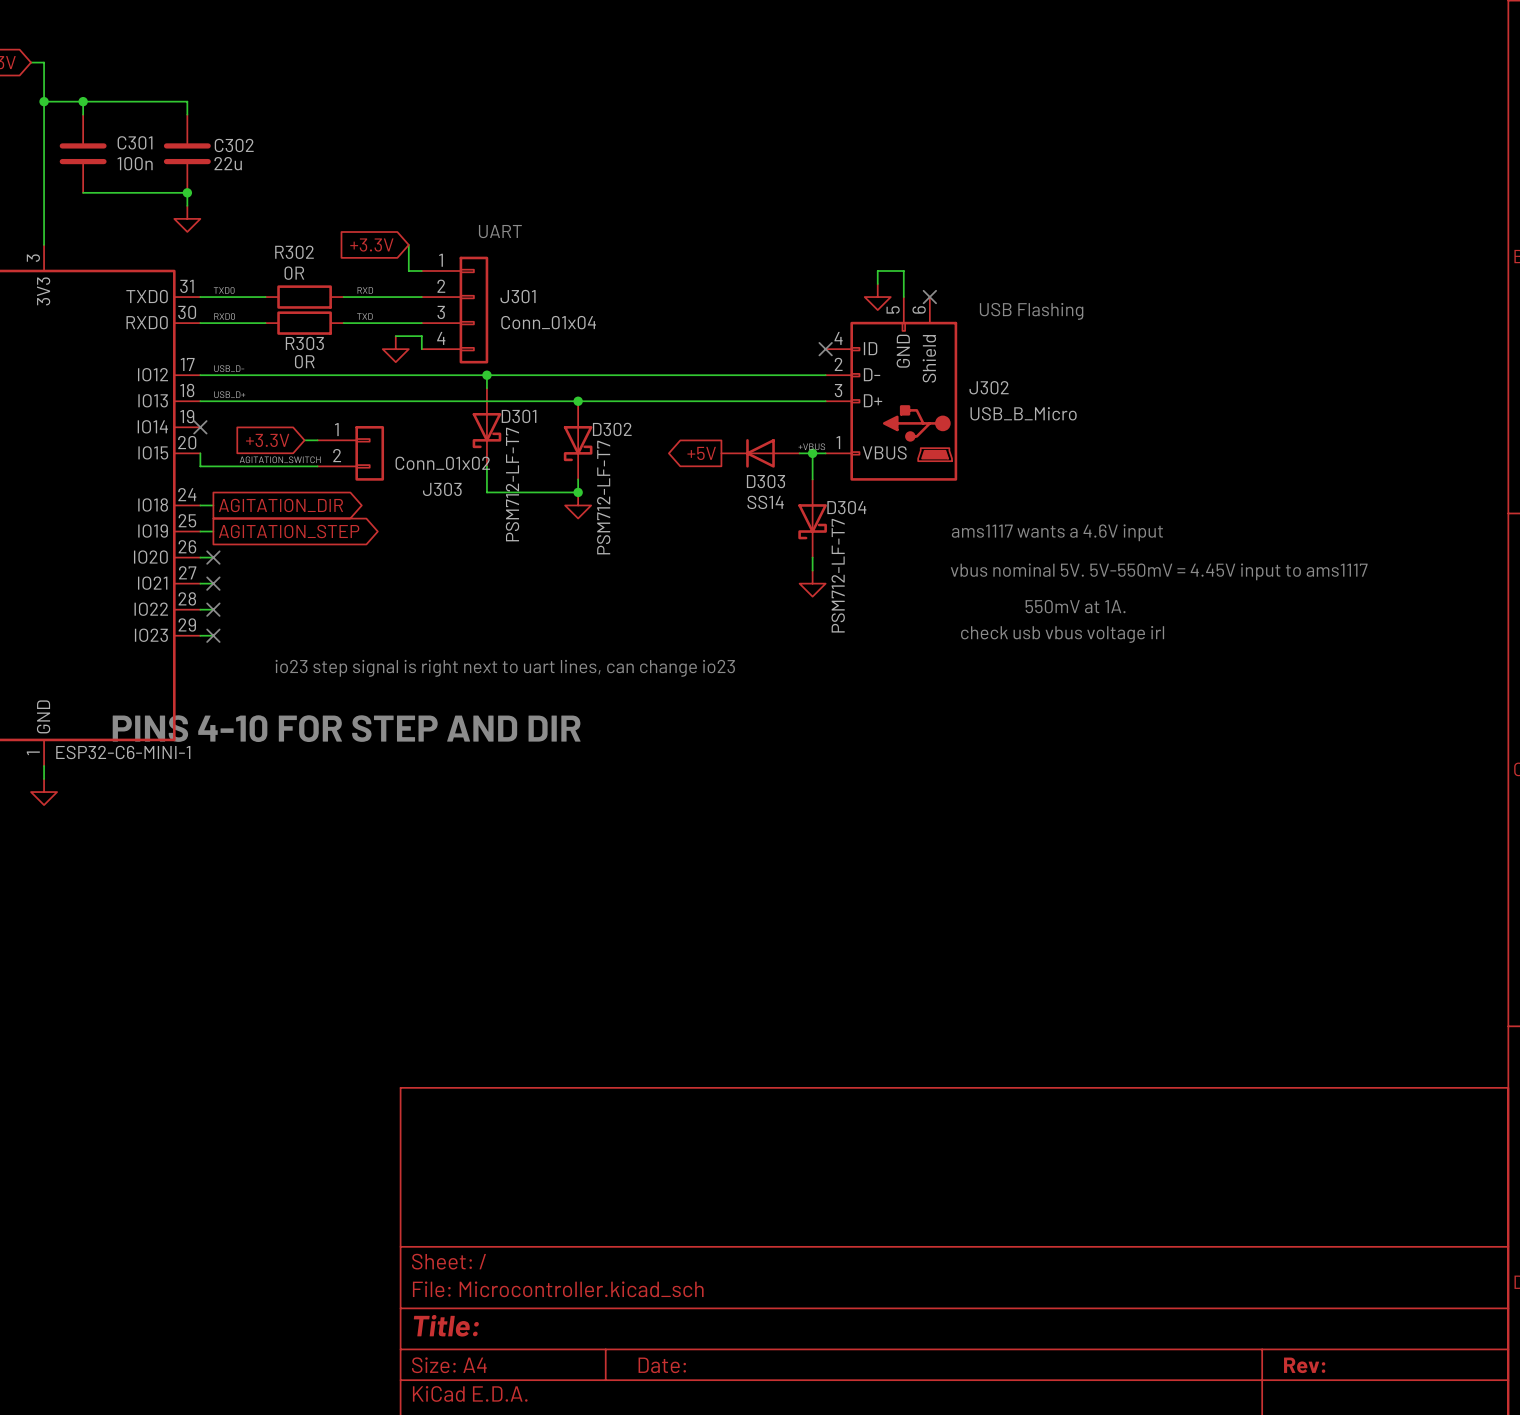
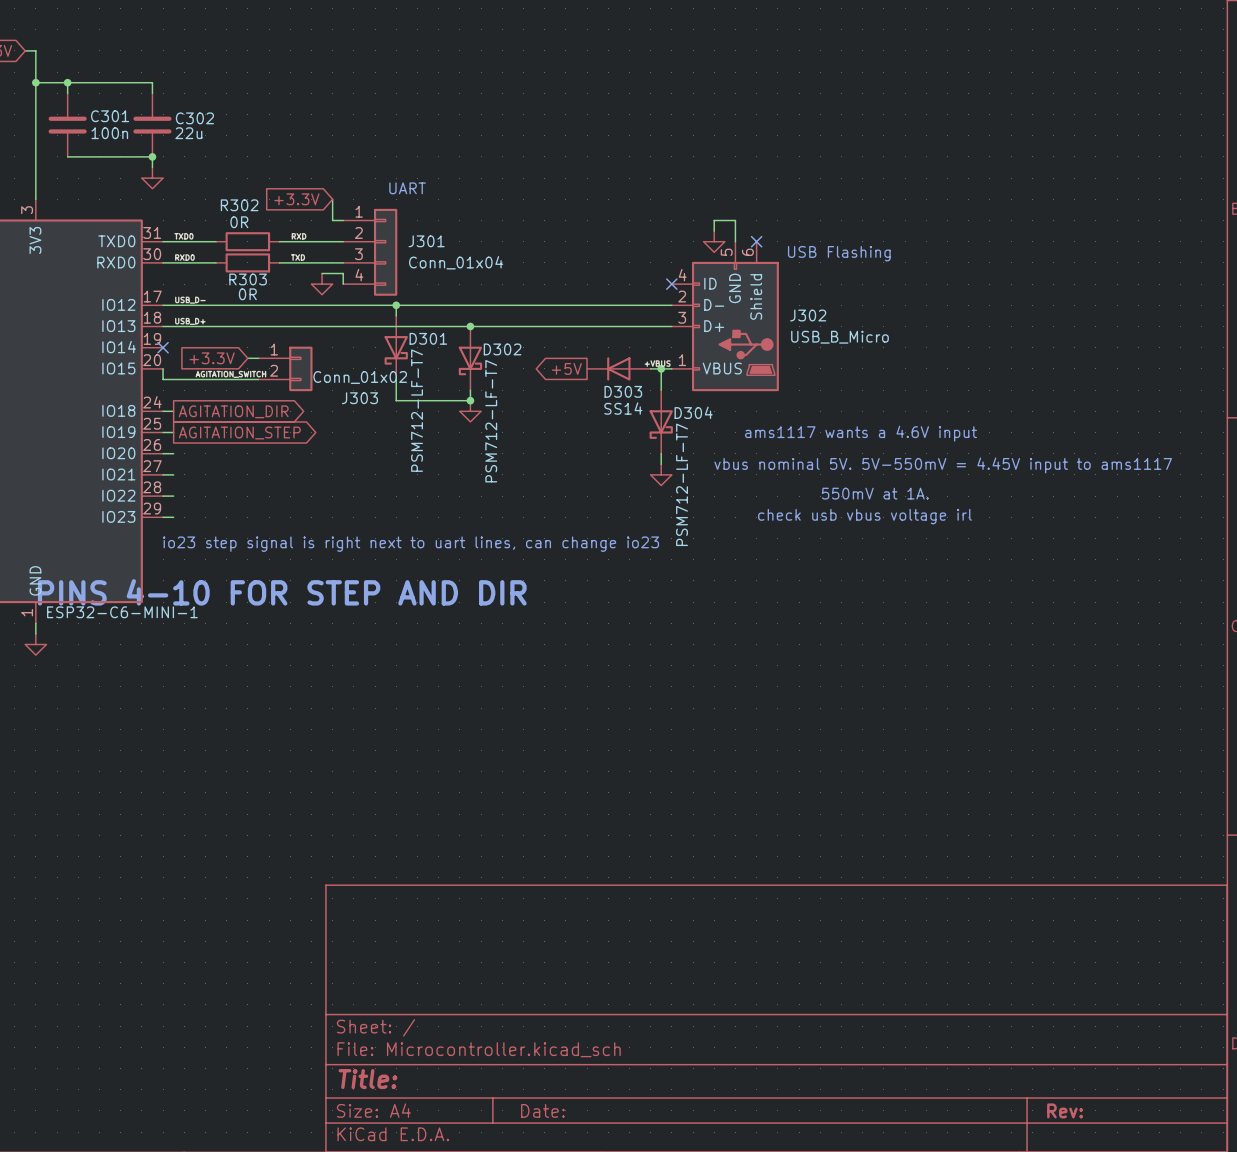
no-connect mark: (213, 557) -> none
no-connect mark: (213, 583) -> none
no-connect mark: (213, 609) -> none
no-connect mark: (213, 635) -> none

